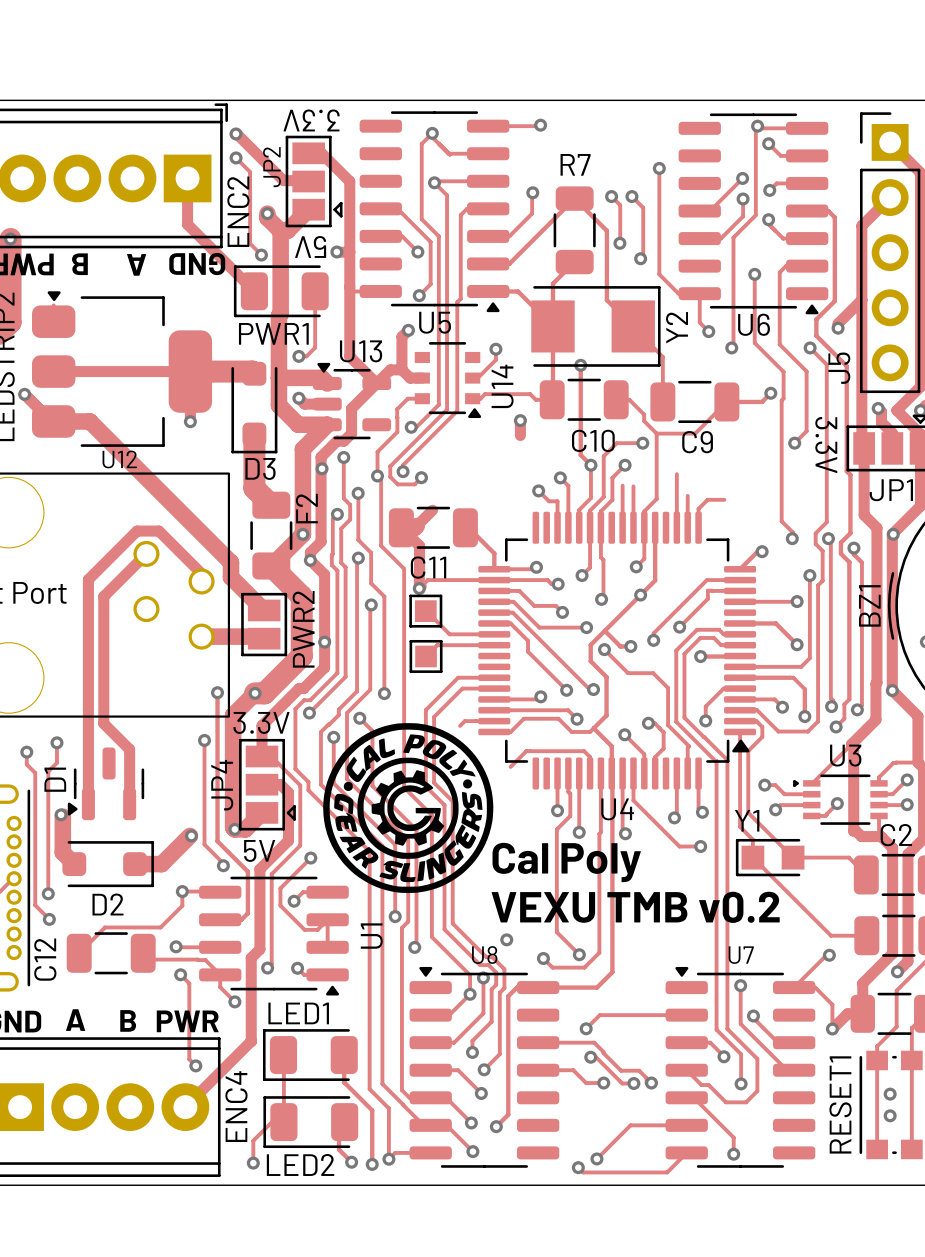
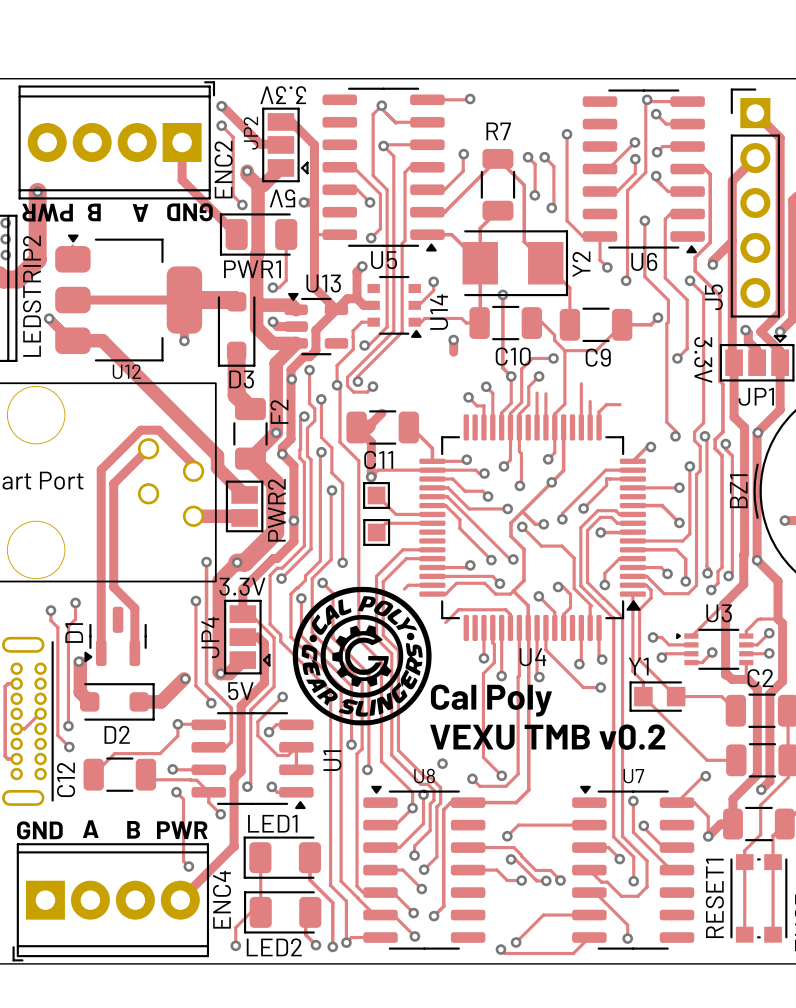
via: (890, 1094) -> none
via: (890, 1115) -> none

